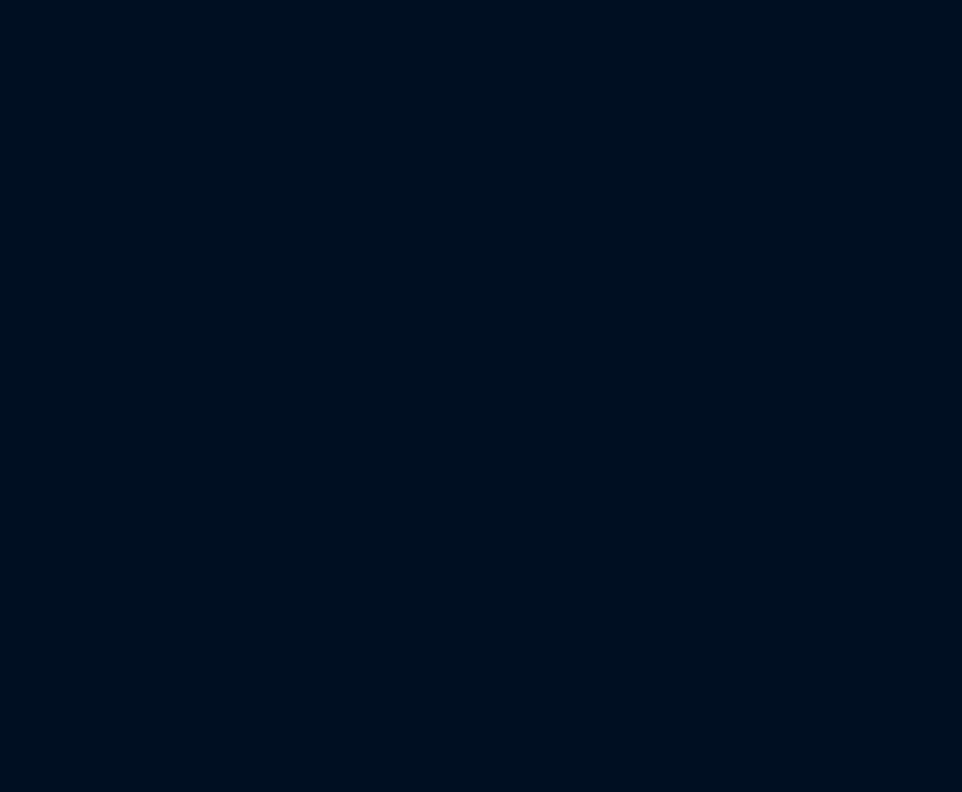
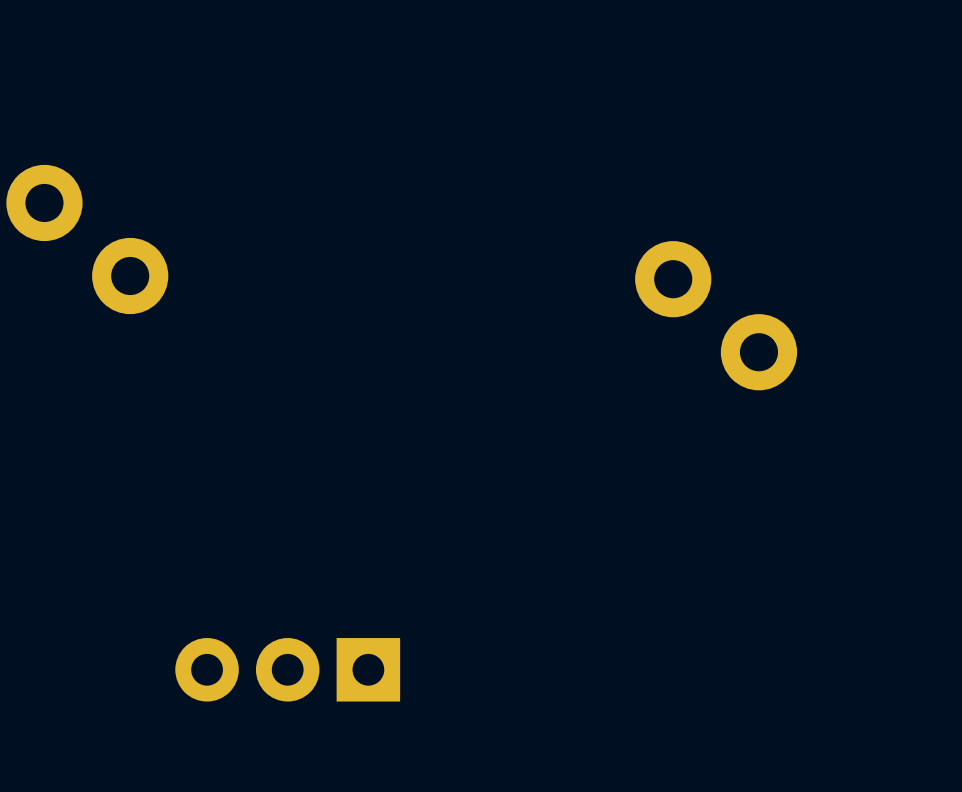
part: none -> (87, 239)
part: none -> (716, 315)
part: none -> (287, 669)

